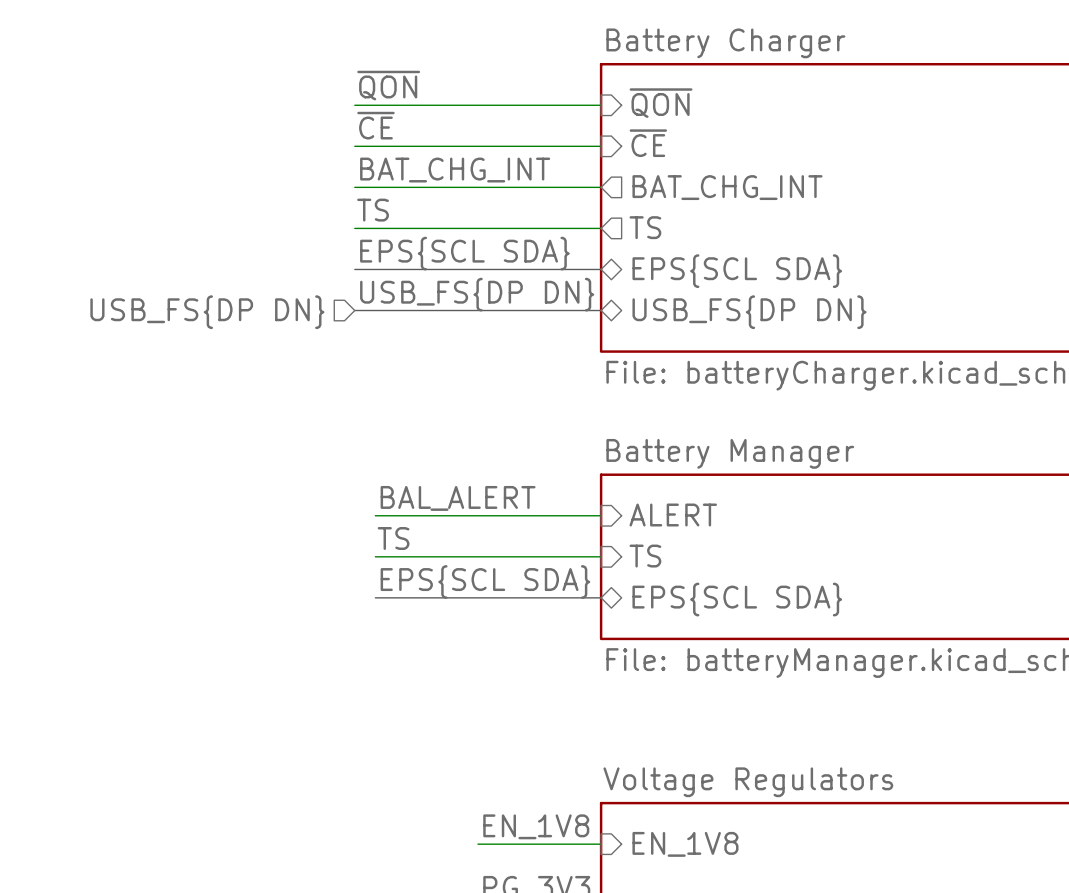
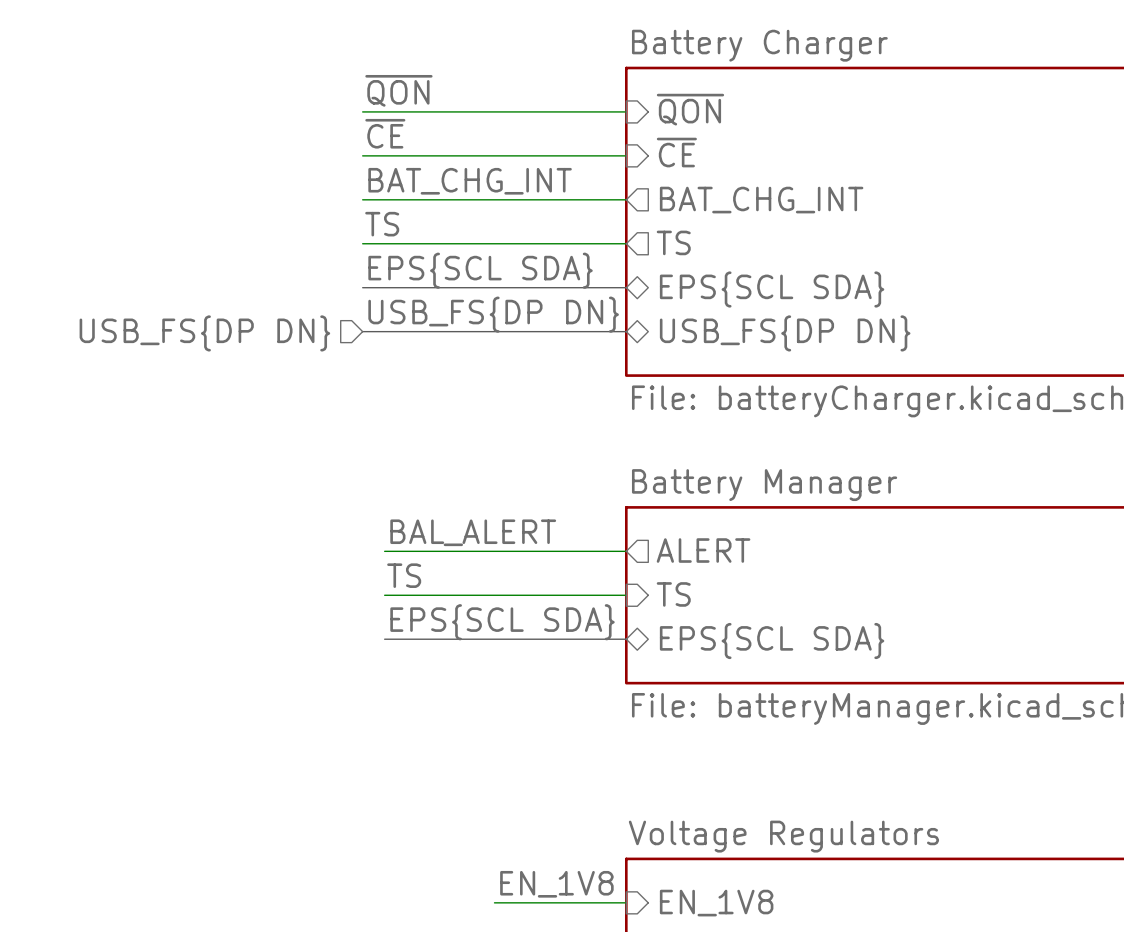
sheet pin shape: input (673, 515) -> output (703, 550)

